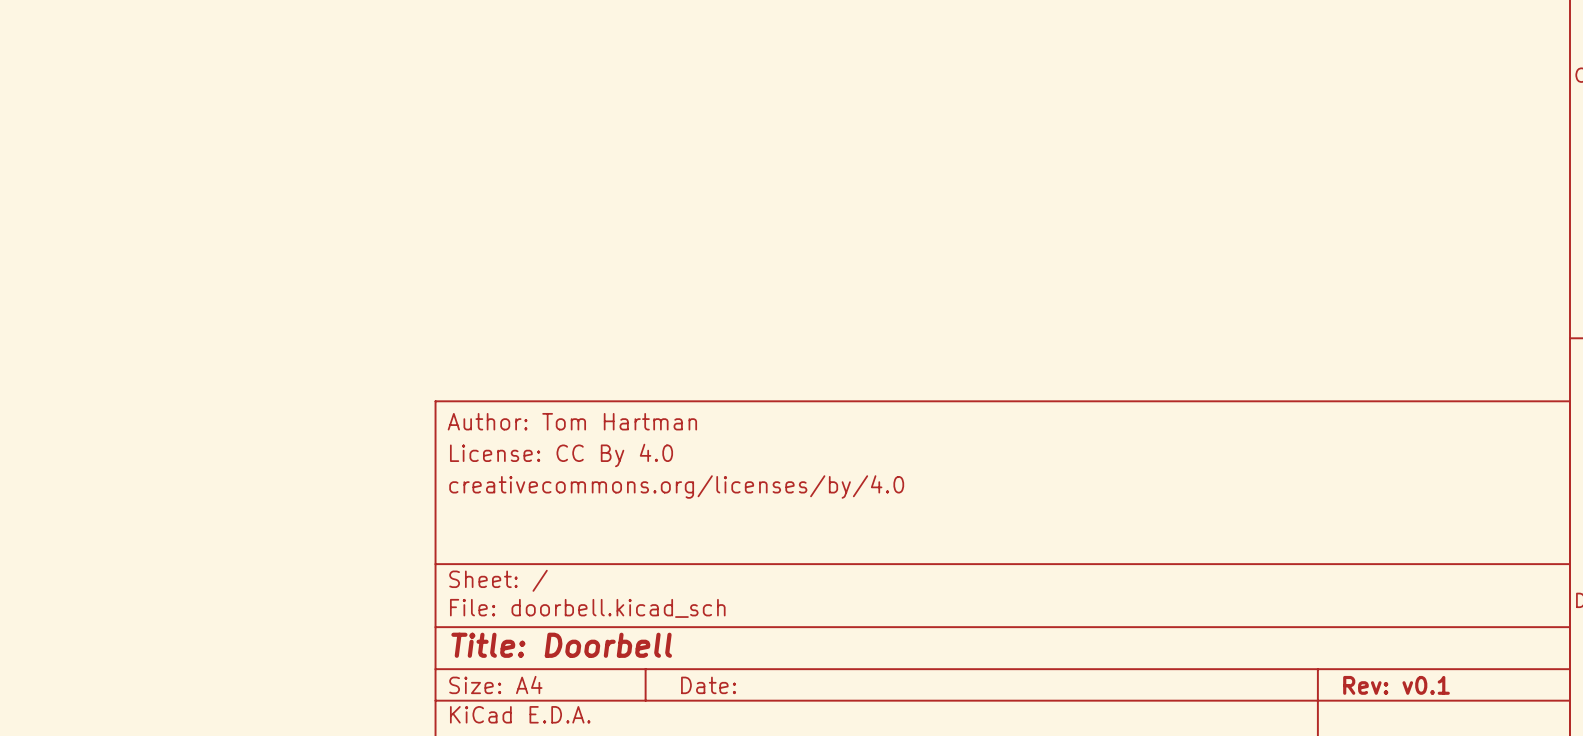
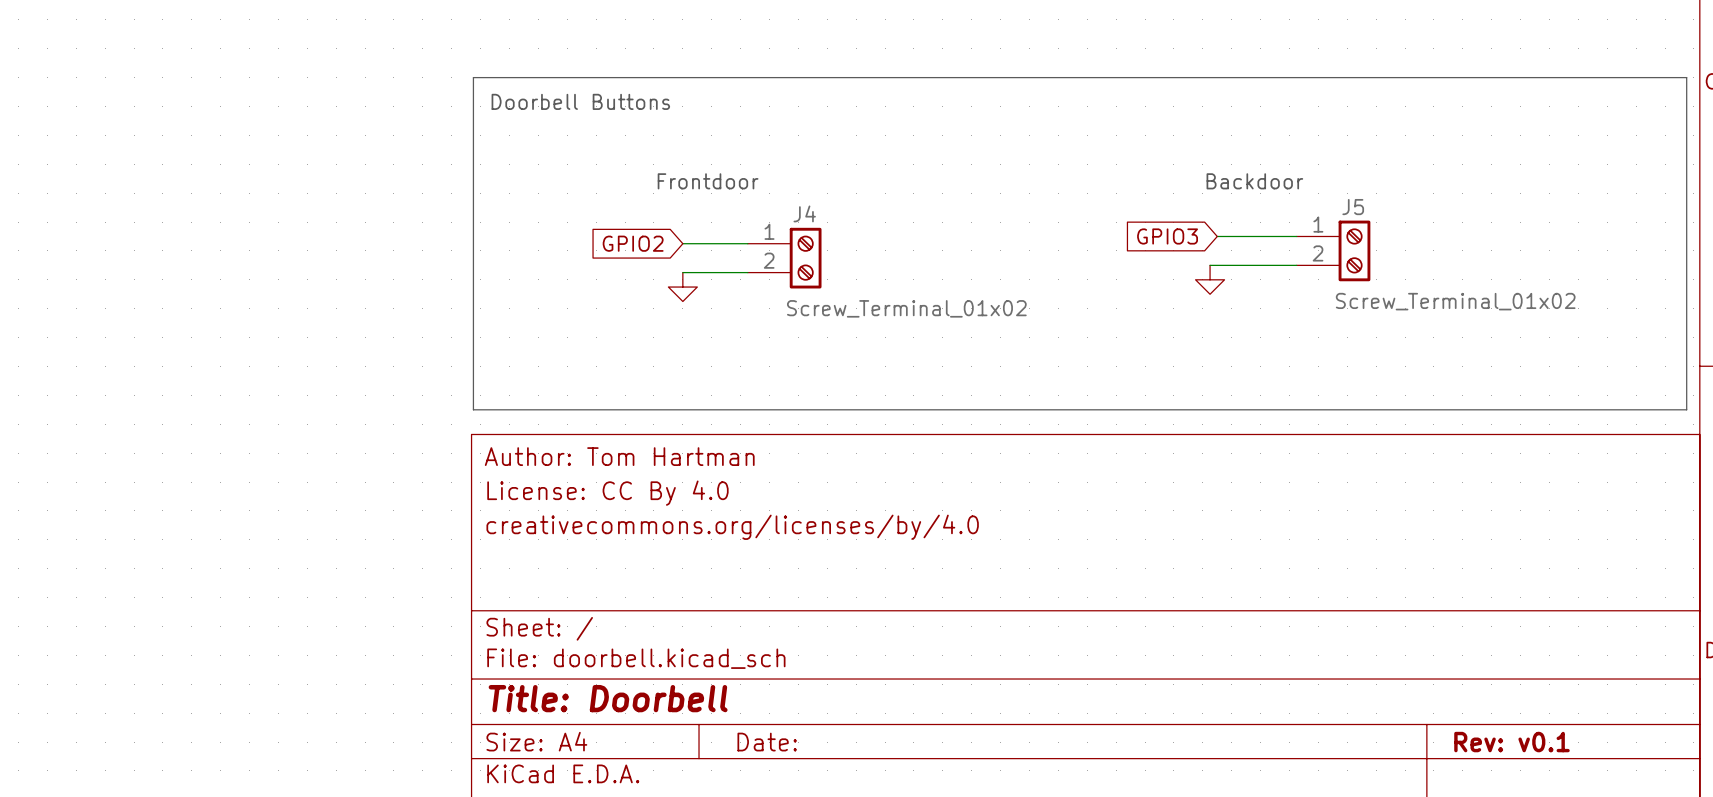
line: none -> (473, 77) (473, 409) (1686, 409) (1686, 77) (473, 77)
text: none -> Doorbell Buttons (580, 101)
text: none -> Frontdoor (708, 181)
text: none -> Backdoor (1254, 181)
global label: none -> GPIO3 (1167, 236)
wire: none -> (1217, 236) (1296, 236)
global label: none -> GPIO2 (633, 243)
wire: none -> (682, 243) (747, 243)
J5: none -> Screw_Terminal_01x02 (1333, 250)
J4: none -> Screw_Terminal_01x02 (784, 258)
wire: none -> (1210, 265) (1296, 265)
wire: none -> (682, 272) (747, 272)
power symbol: none -> (1210, 279)
power symbol: none -> (682, 287)

